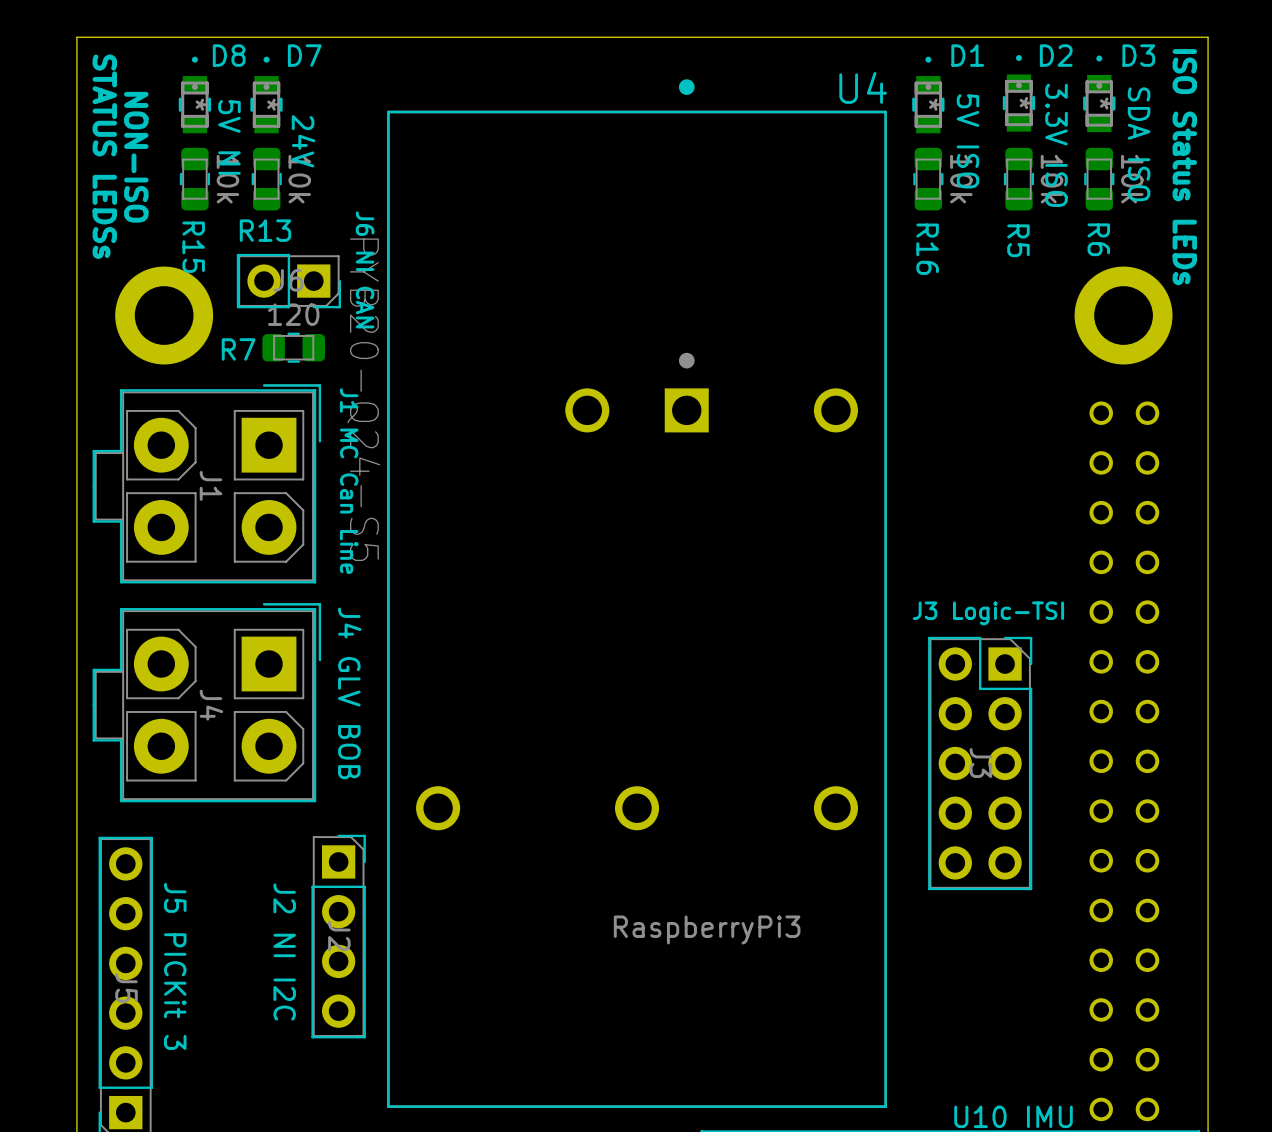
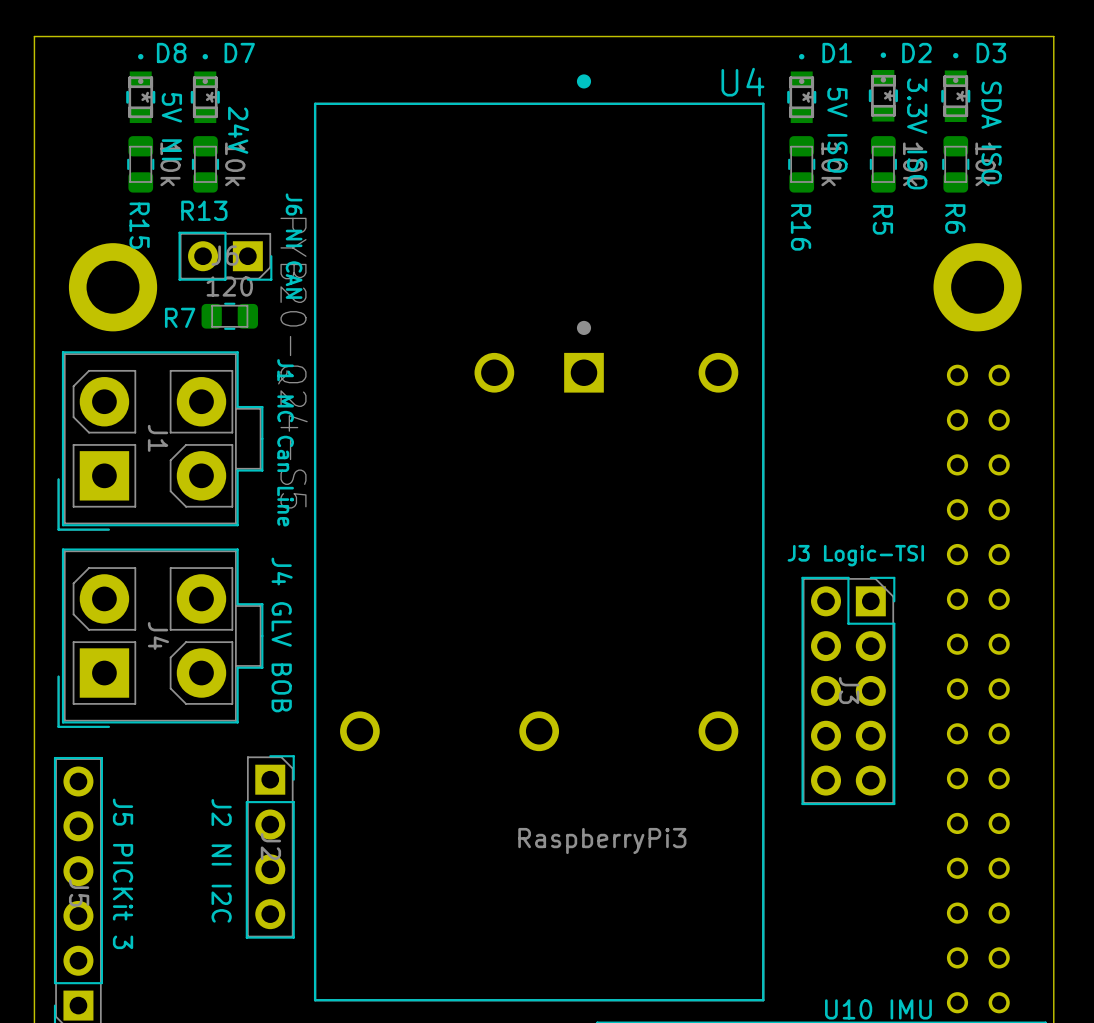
text: STATUS LEDSs (104, 156) -> none
text: NON-ISO (136, 157) -> none
text: ISO Status LEDs (1184, 167) -> none
J1 rotation: 0° (206, 483) -> 180° (160, 440)
J4 rotation: 0° (206, 702) -> 180° (160, 638)

